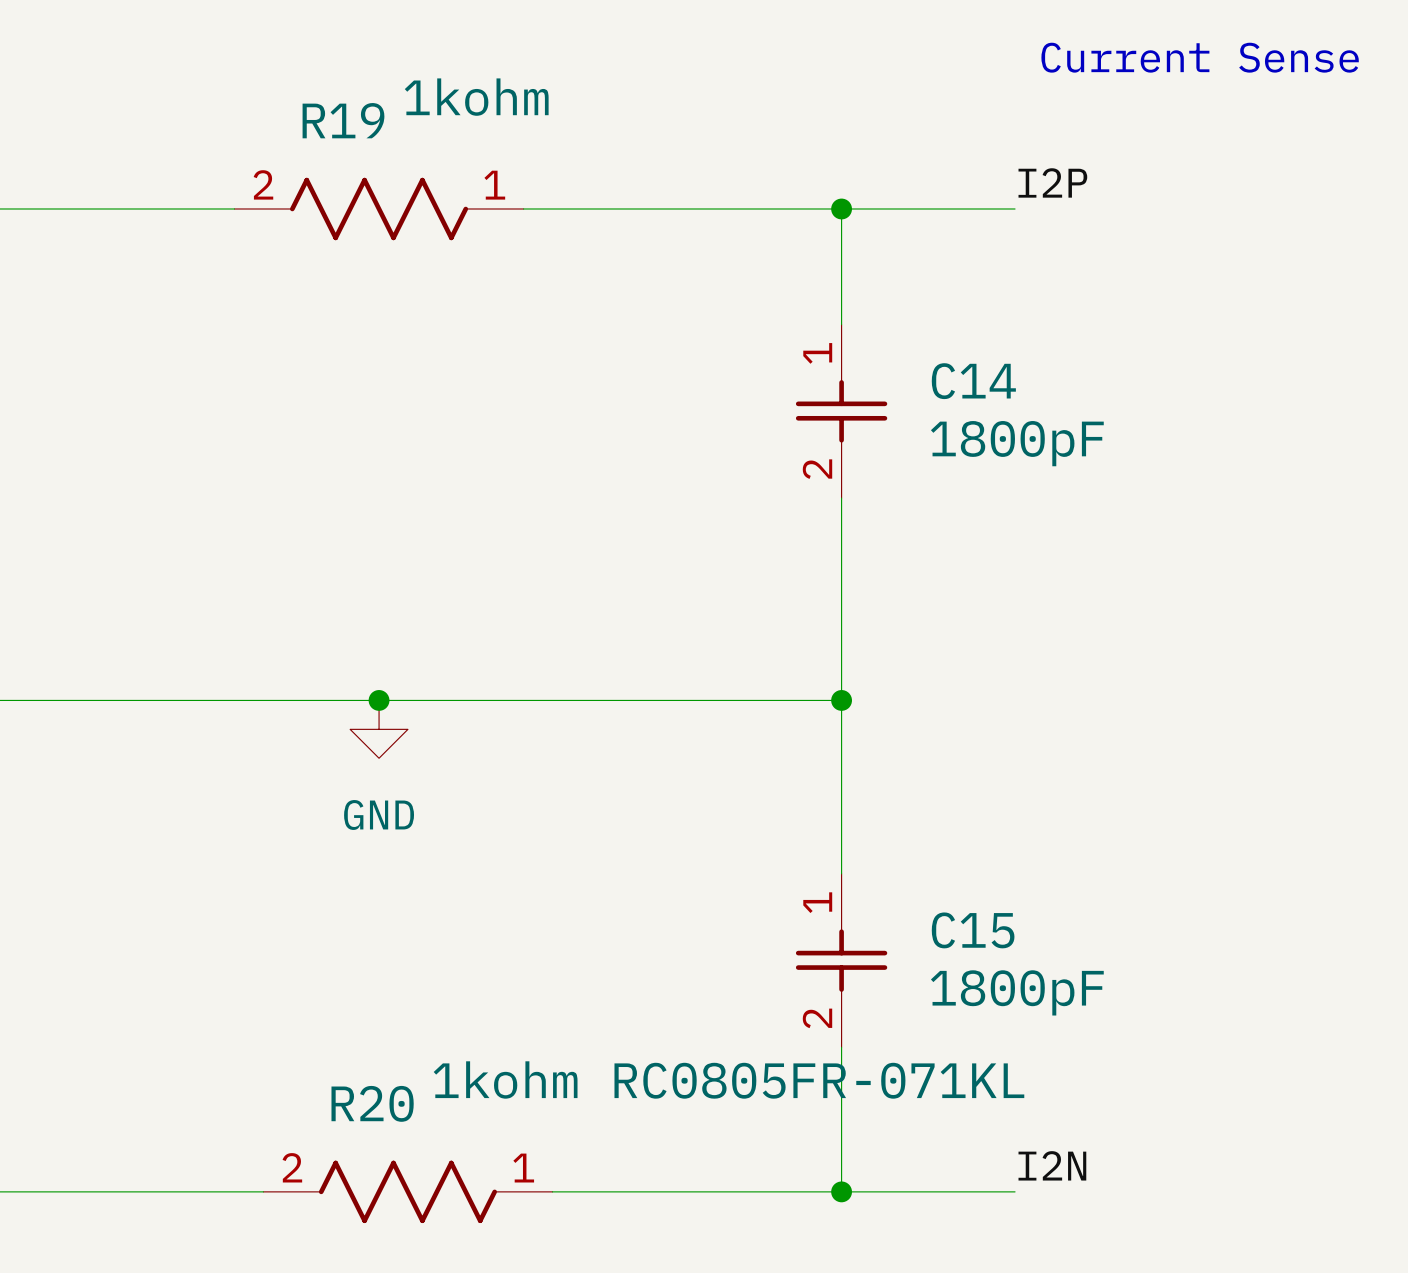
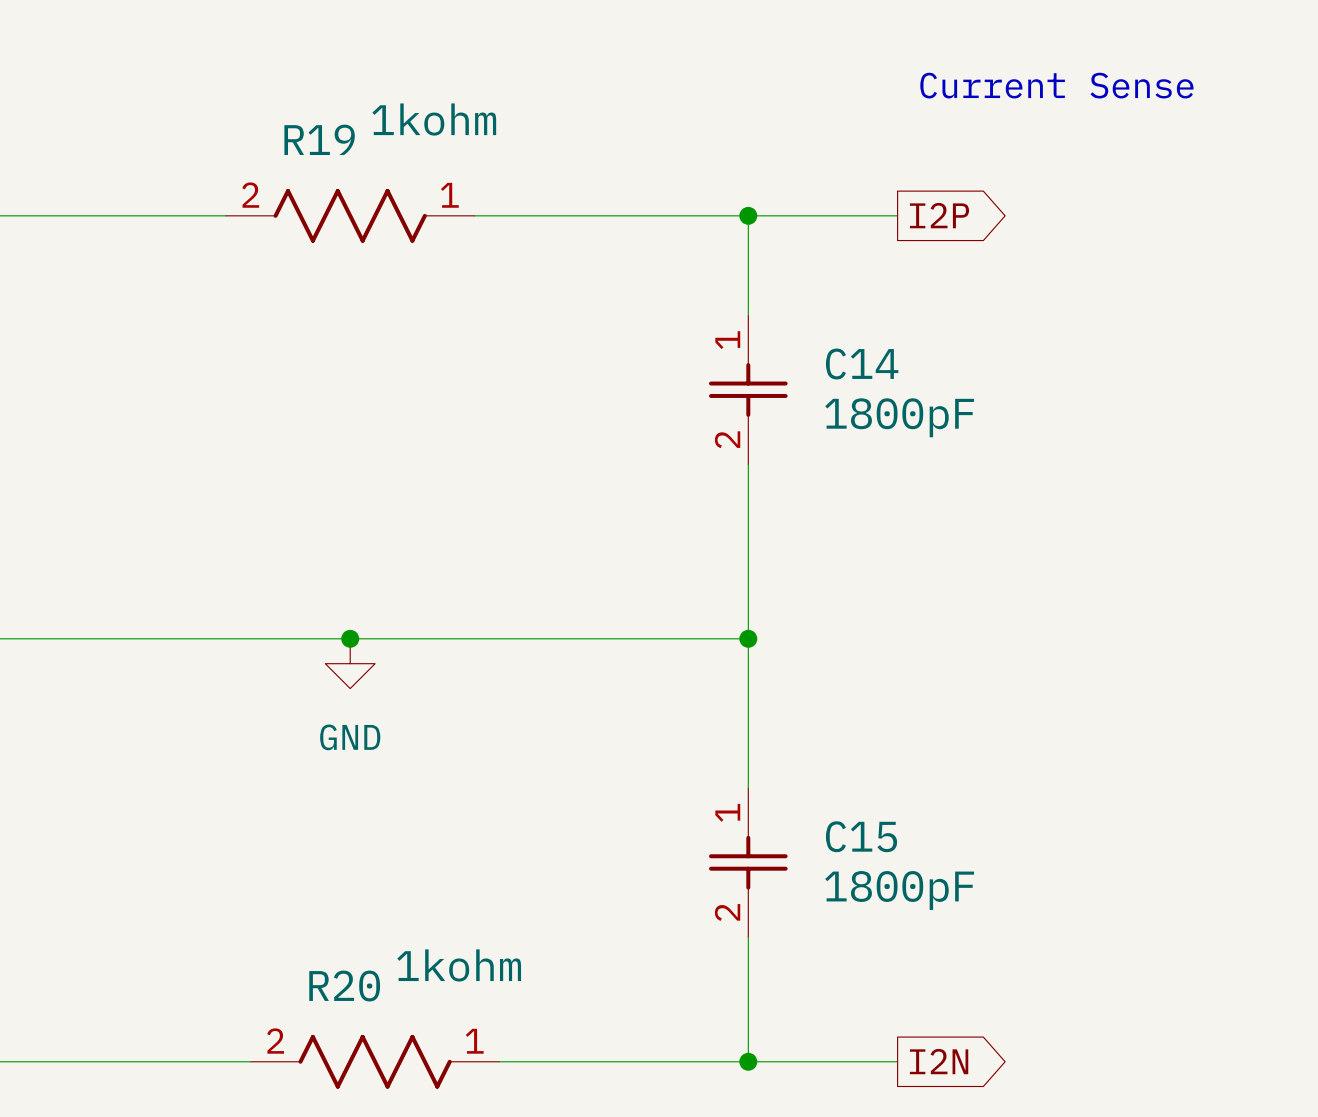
label: I2P (1052, 182) -> none
global label: none -> I2P (939, 215)
R20 value: 1kohm RC0805FR-071KL (728, 1079) -> 1kohm (459, 965)
label: I2N (1052, 1165) -> none
global label: none -> I2N (939, 1061)

